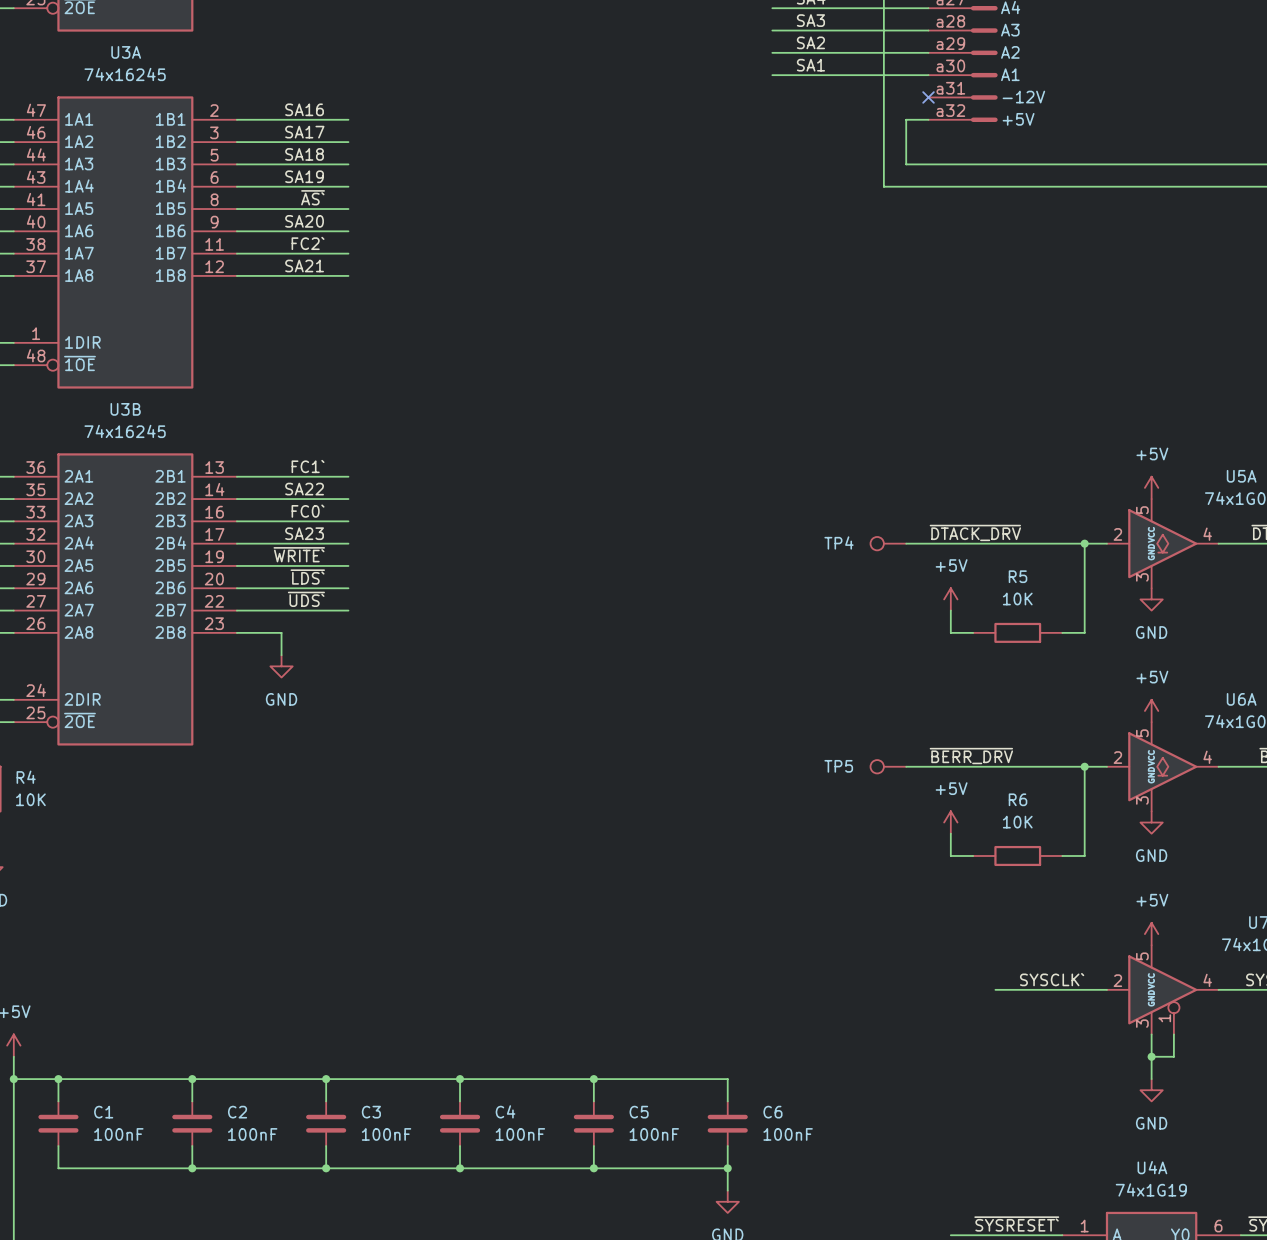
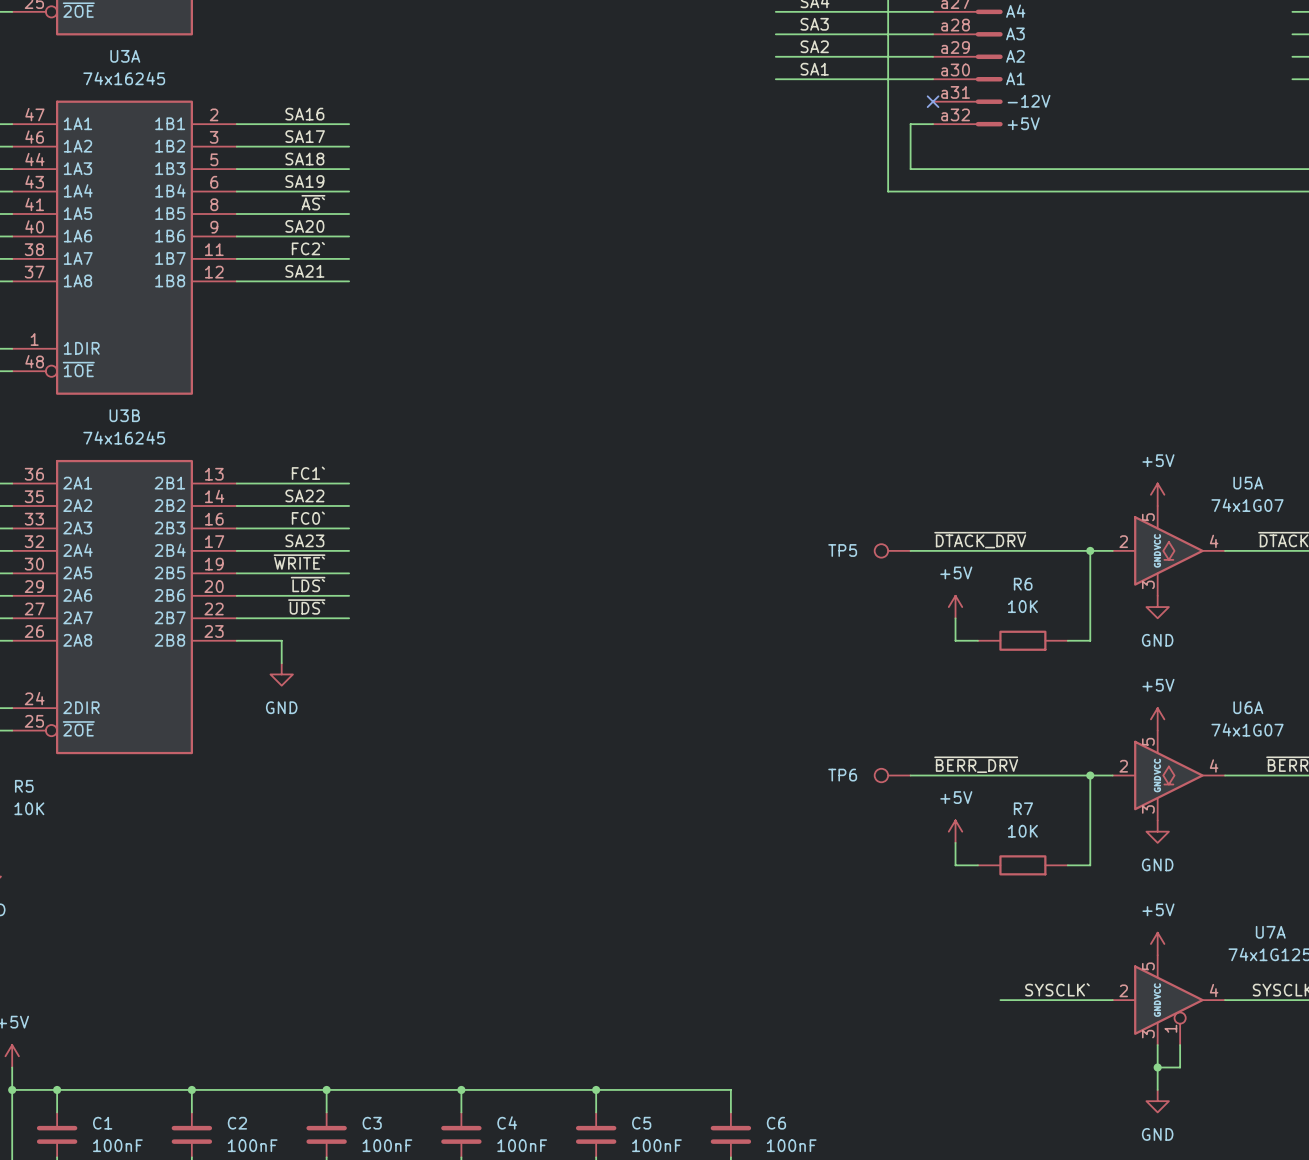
TP4 name: TP4 (839, 542) -> TP5 (842, 550)
R5 name: R5 (1018, 576) -> R6 (1023, 584)
TP5 name: TP5 (838, 766) -> TP6 (842, 775)
R4 name: R4 (26, 777) -> R5 (24, 786)
R6 name: R6 (1018, 799) -> R7 (1023, 808)

